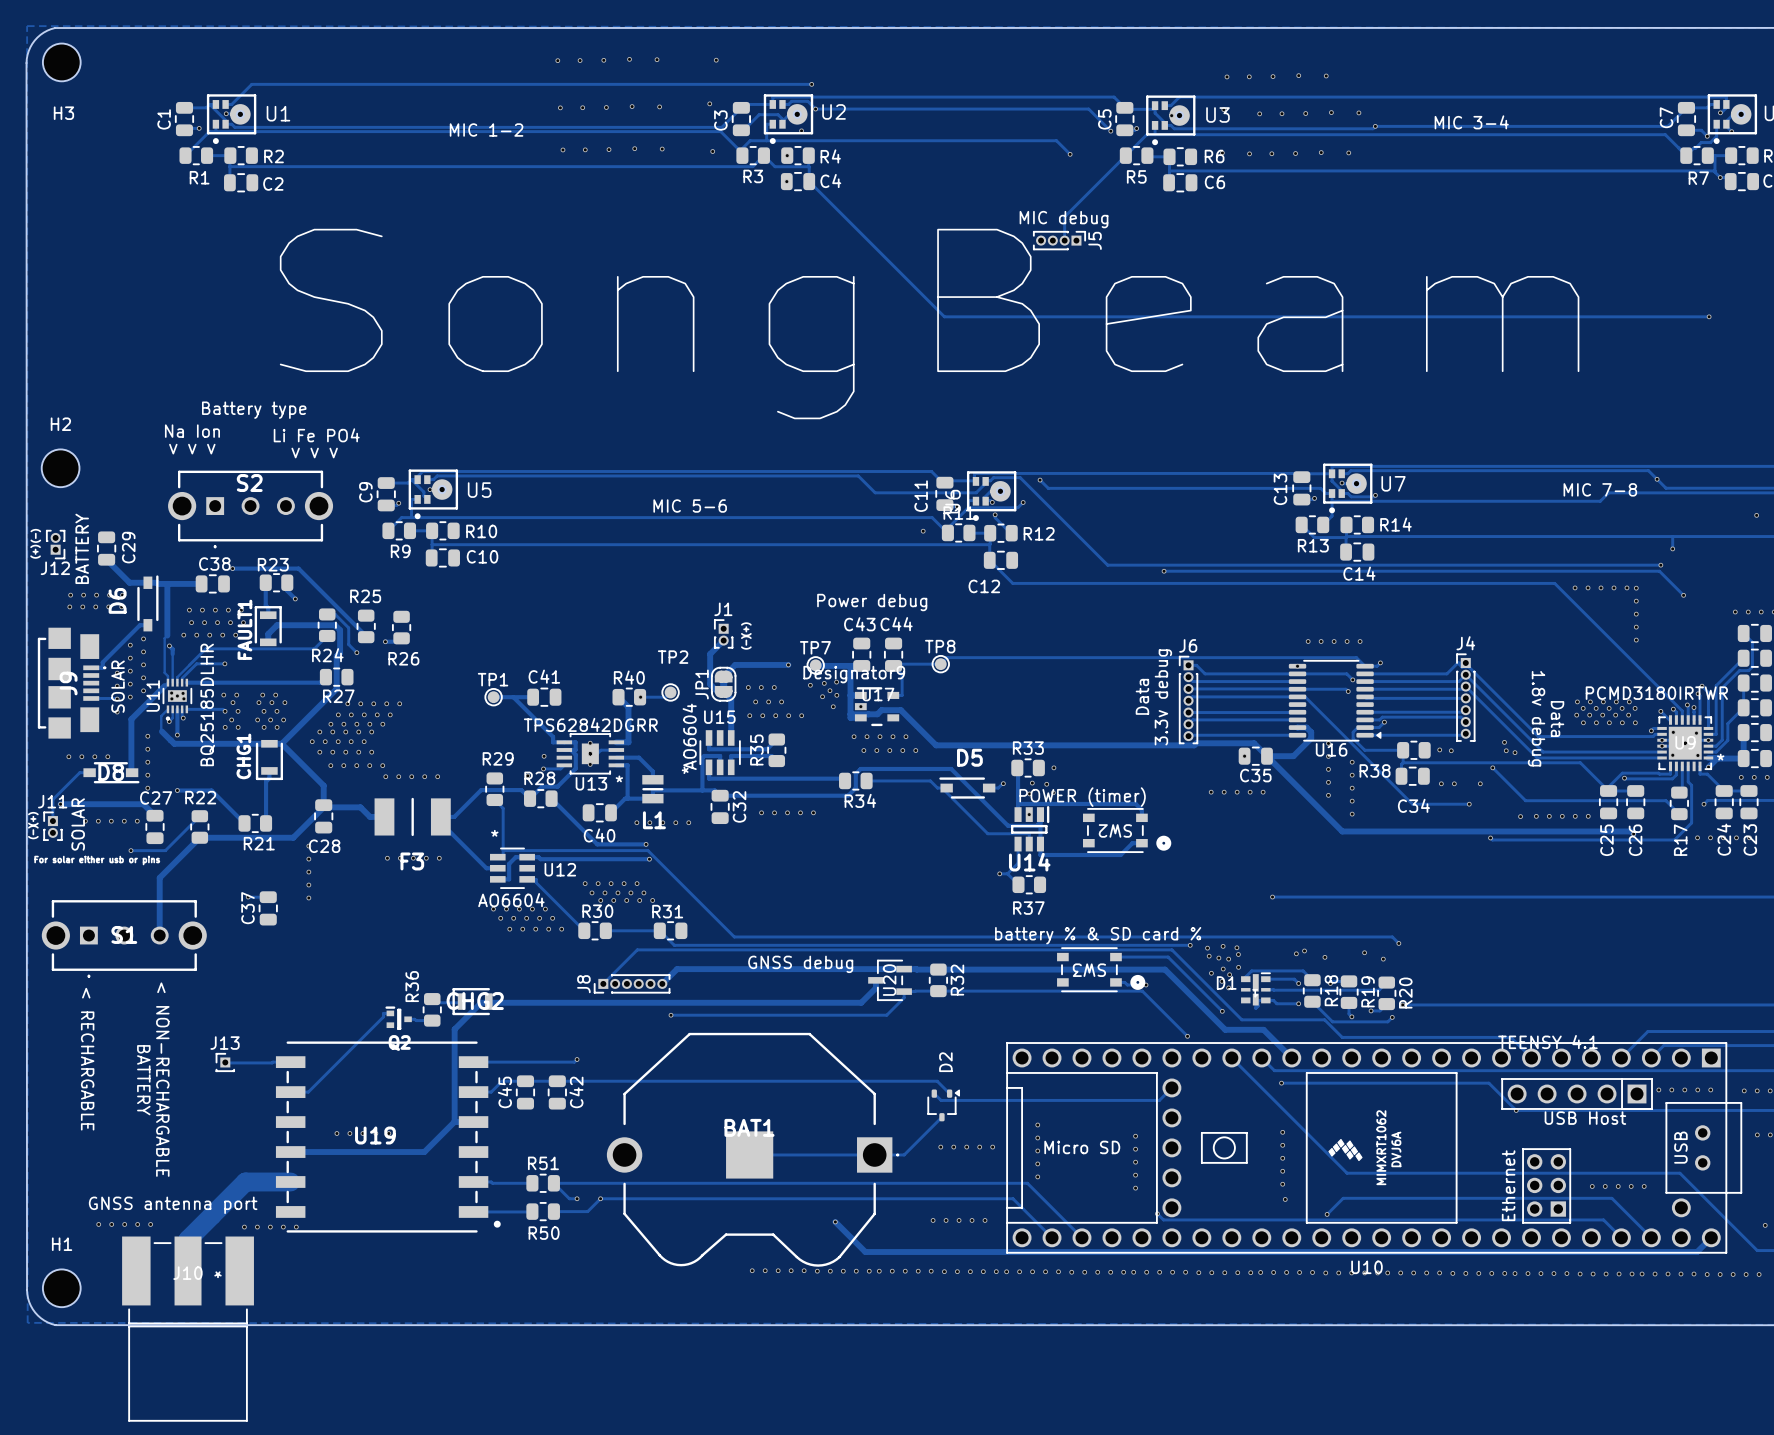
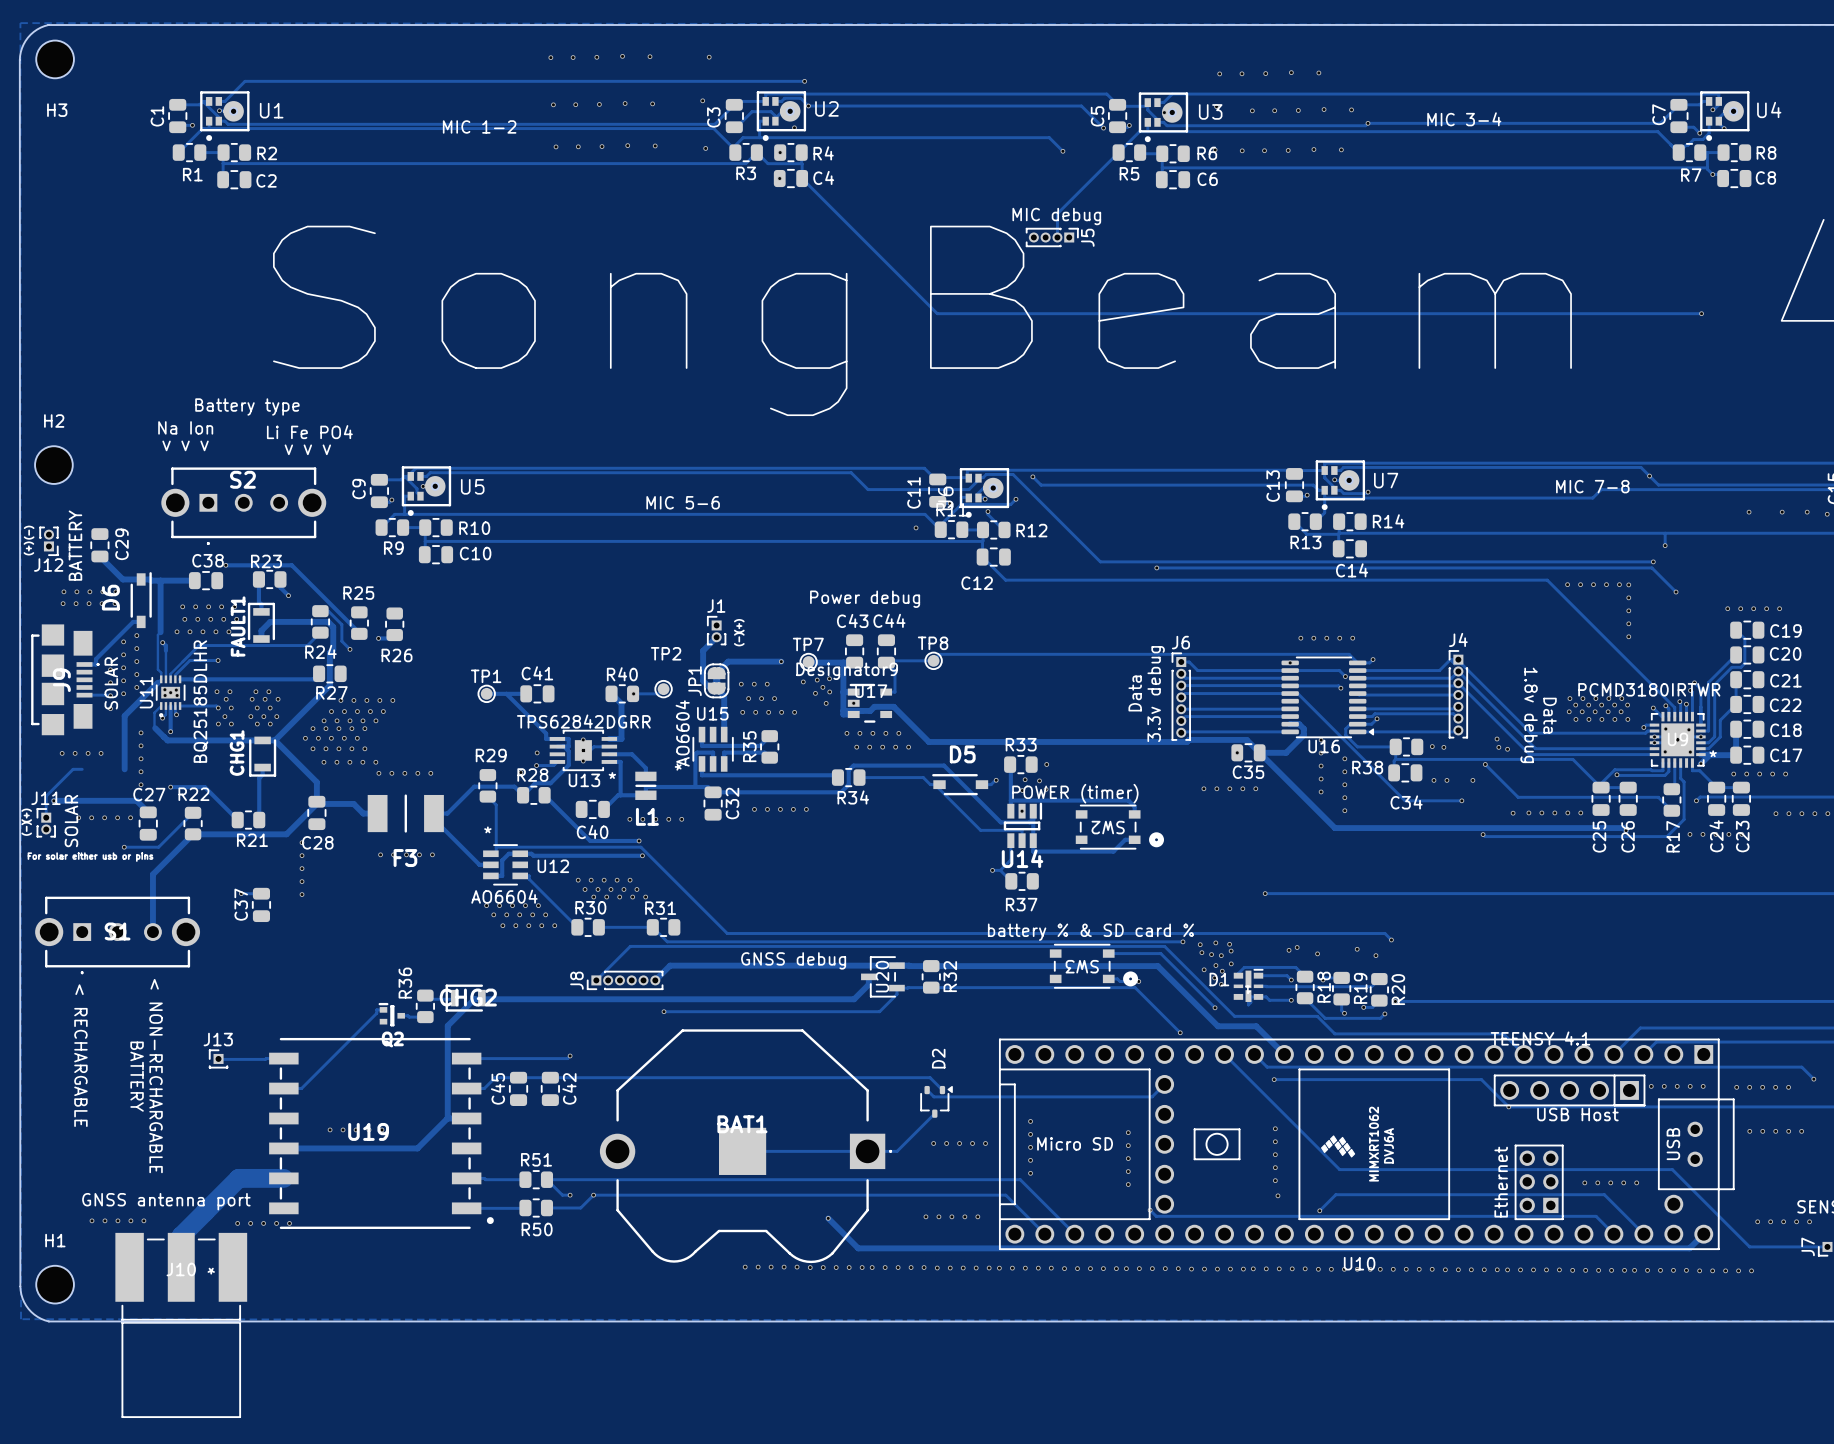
D8: (111, 772) -> none

